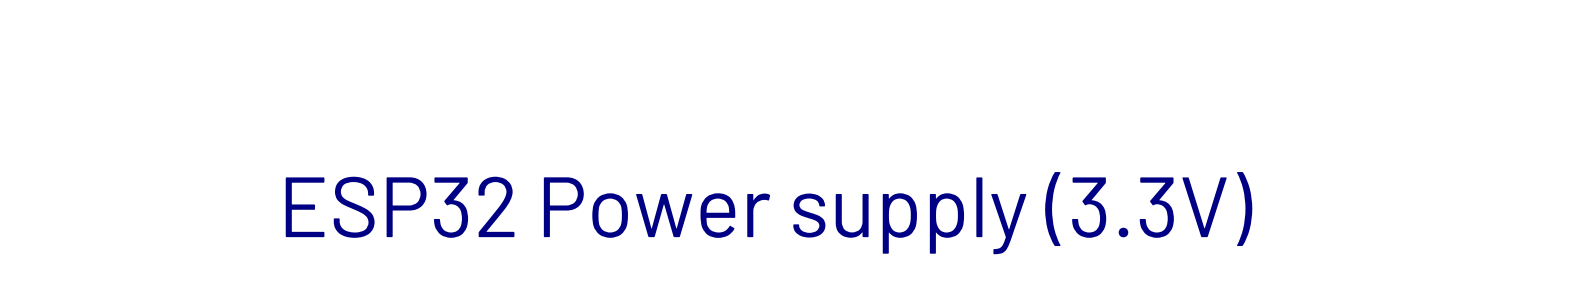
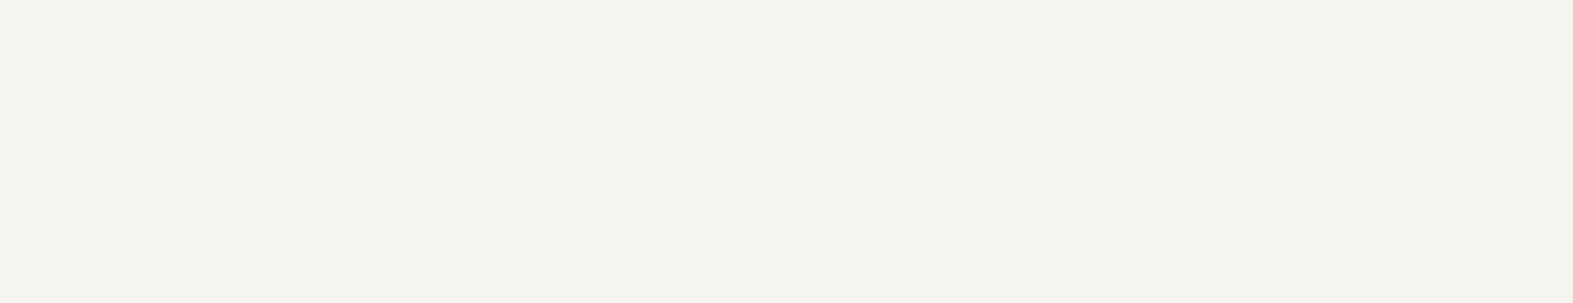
text: ESP32 Power supply (3.3V) (769, 213) -> none

